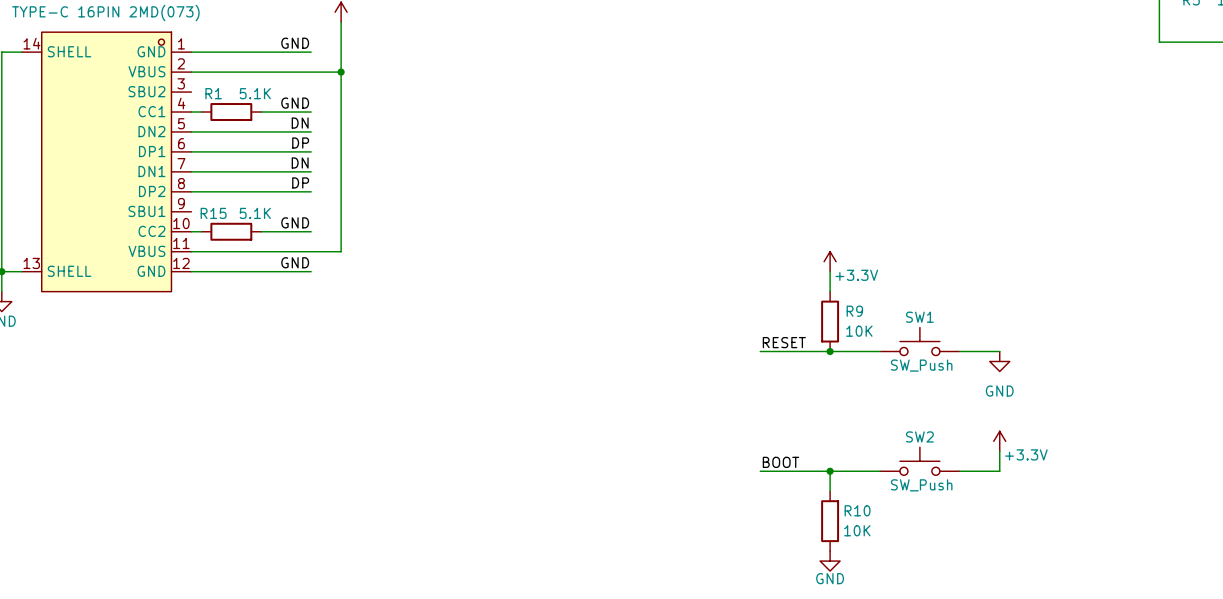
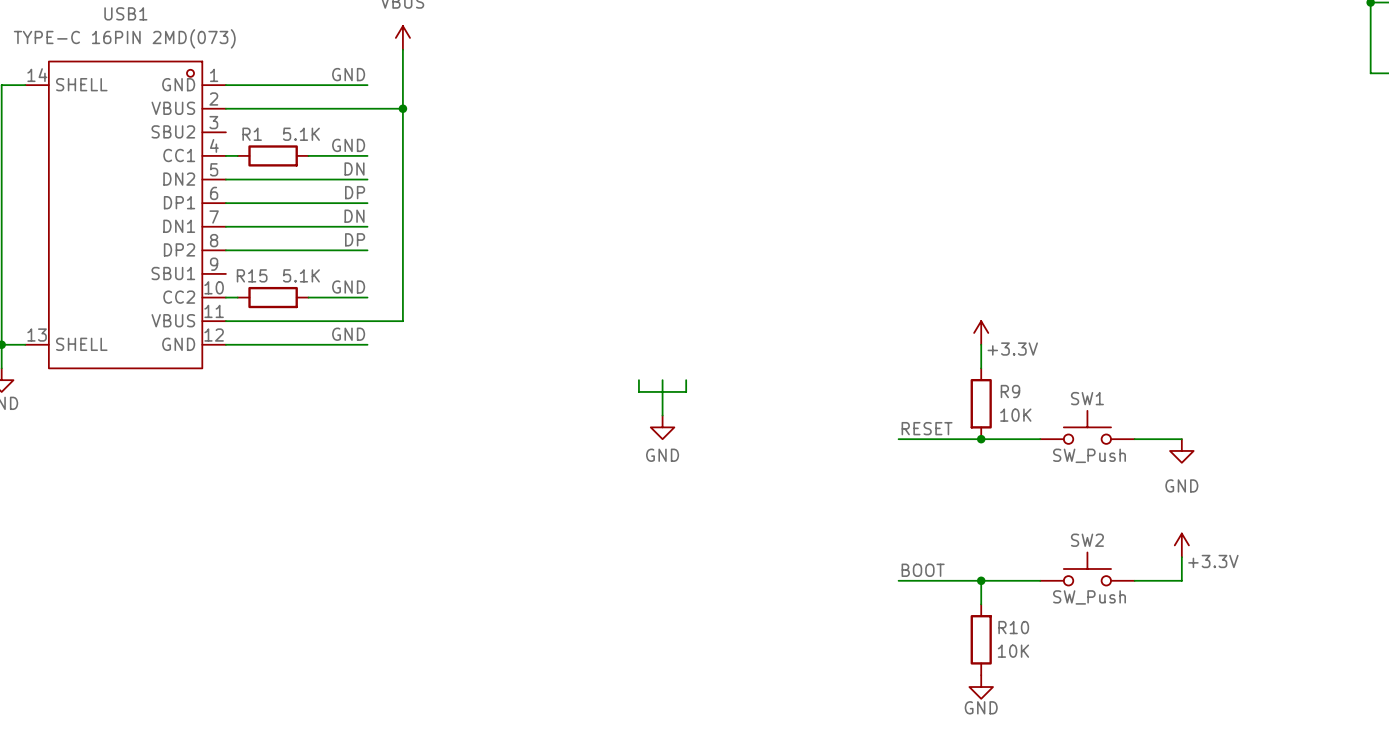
wire: none -> (638, 380) (638, 391) (686, 391) (686, 380)
wire: none -> (662, 380) (662, 415)
power symbol: none -> GND (662, 427)

